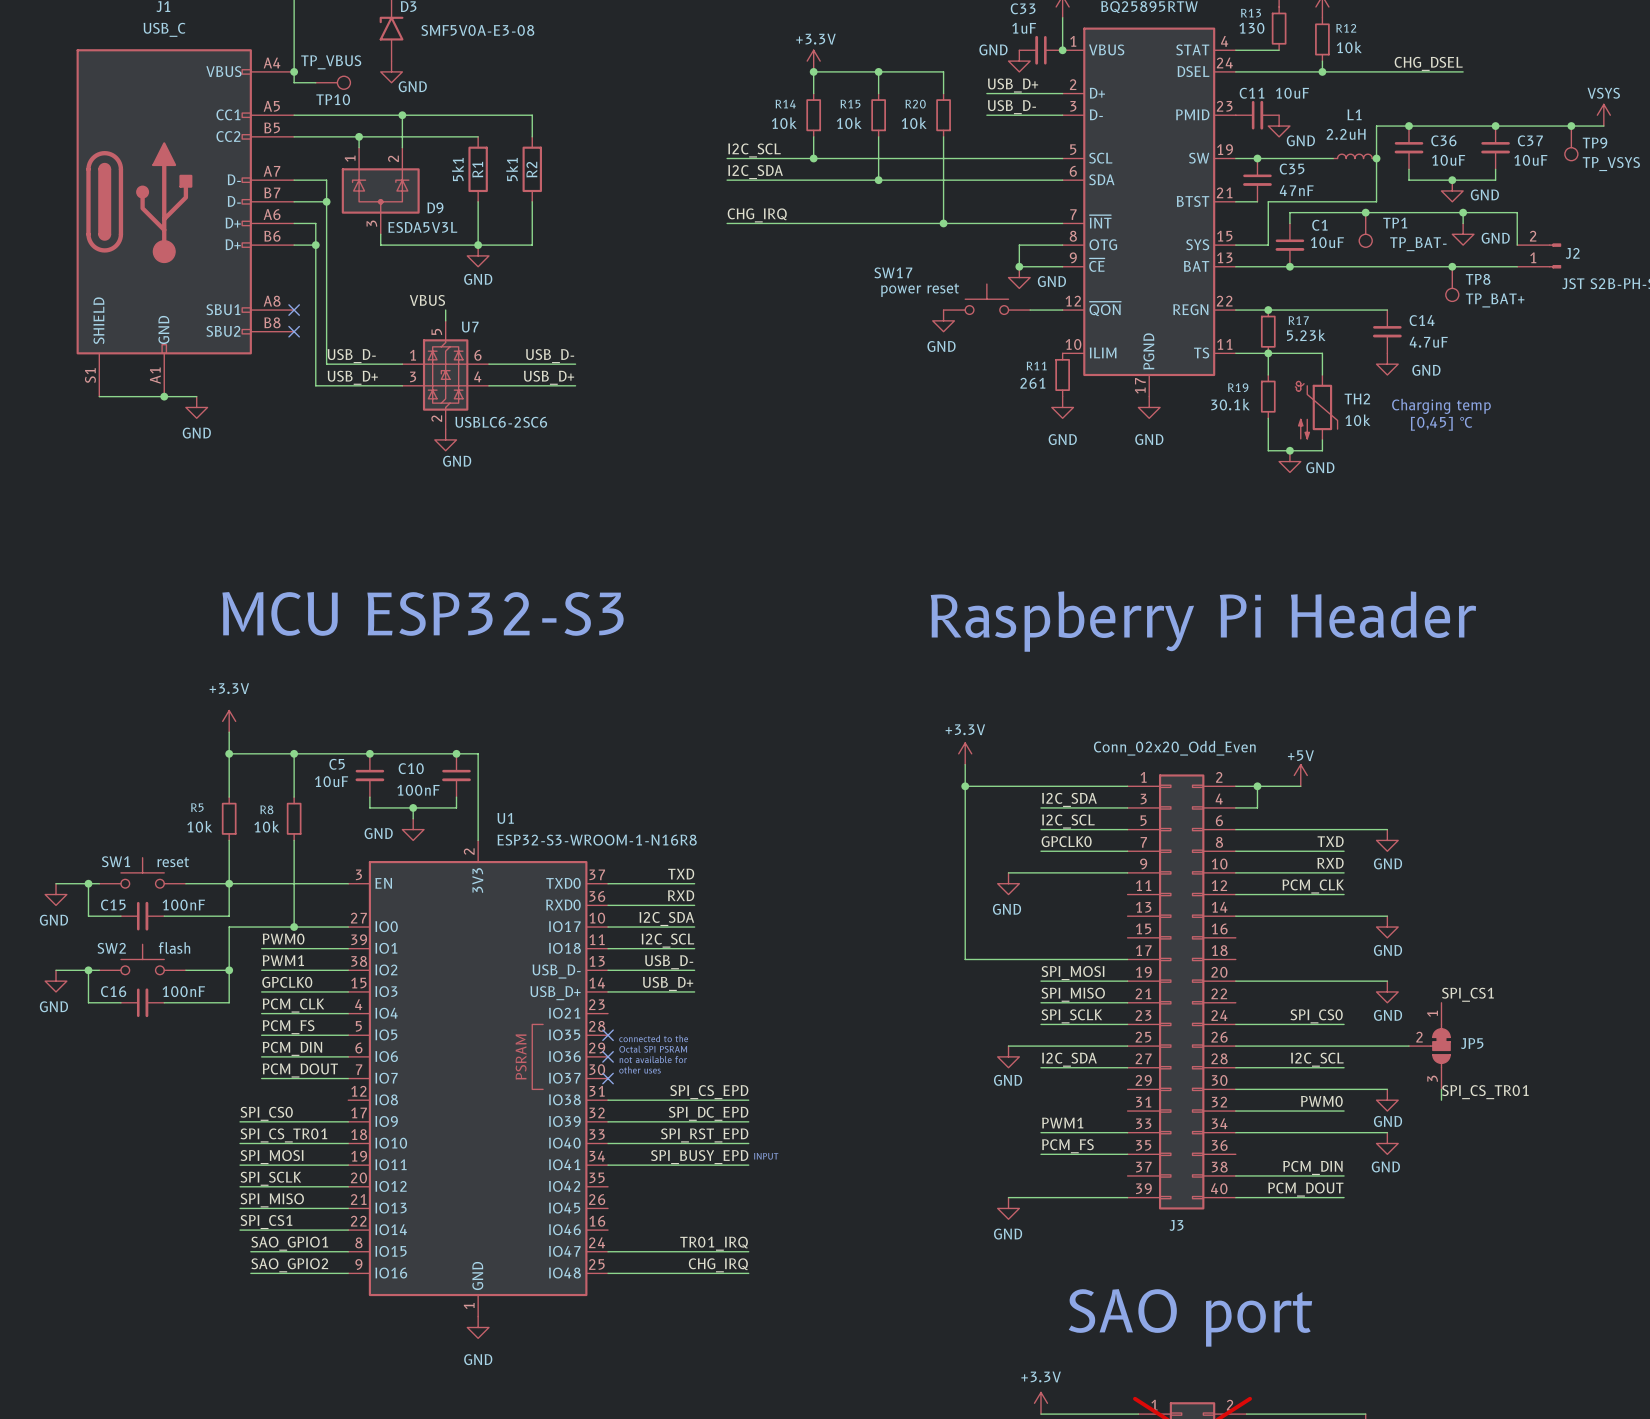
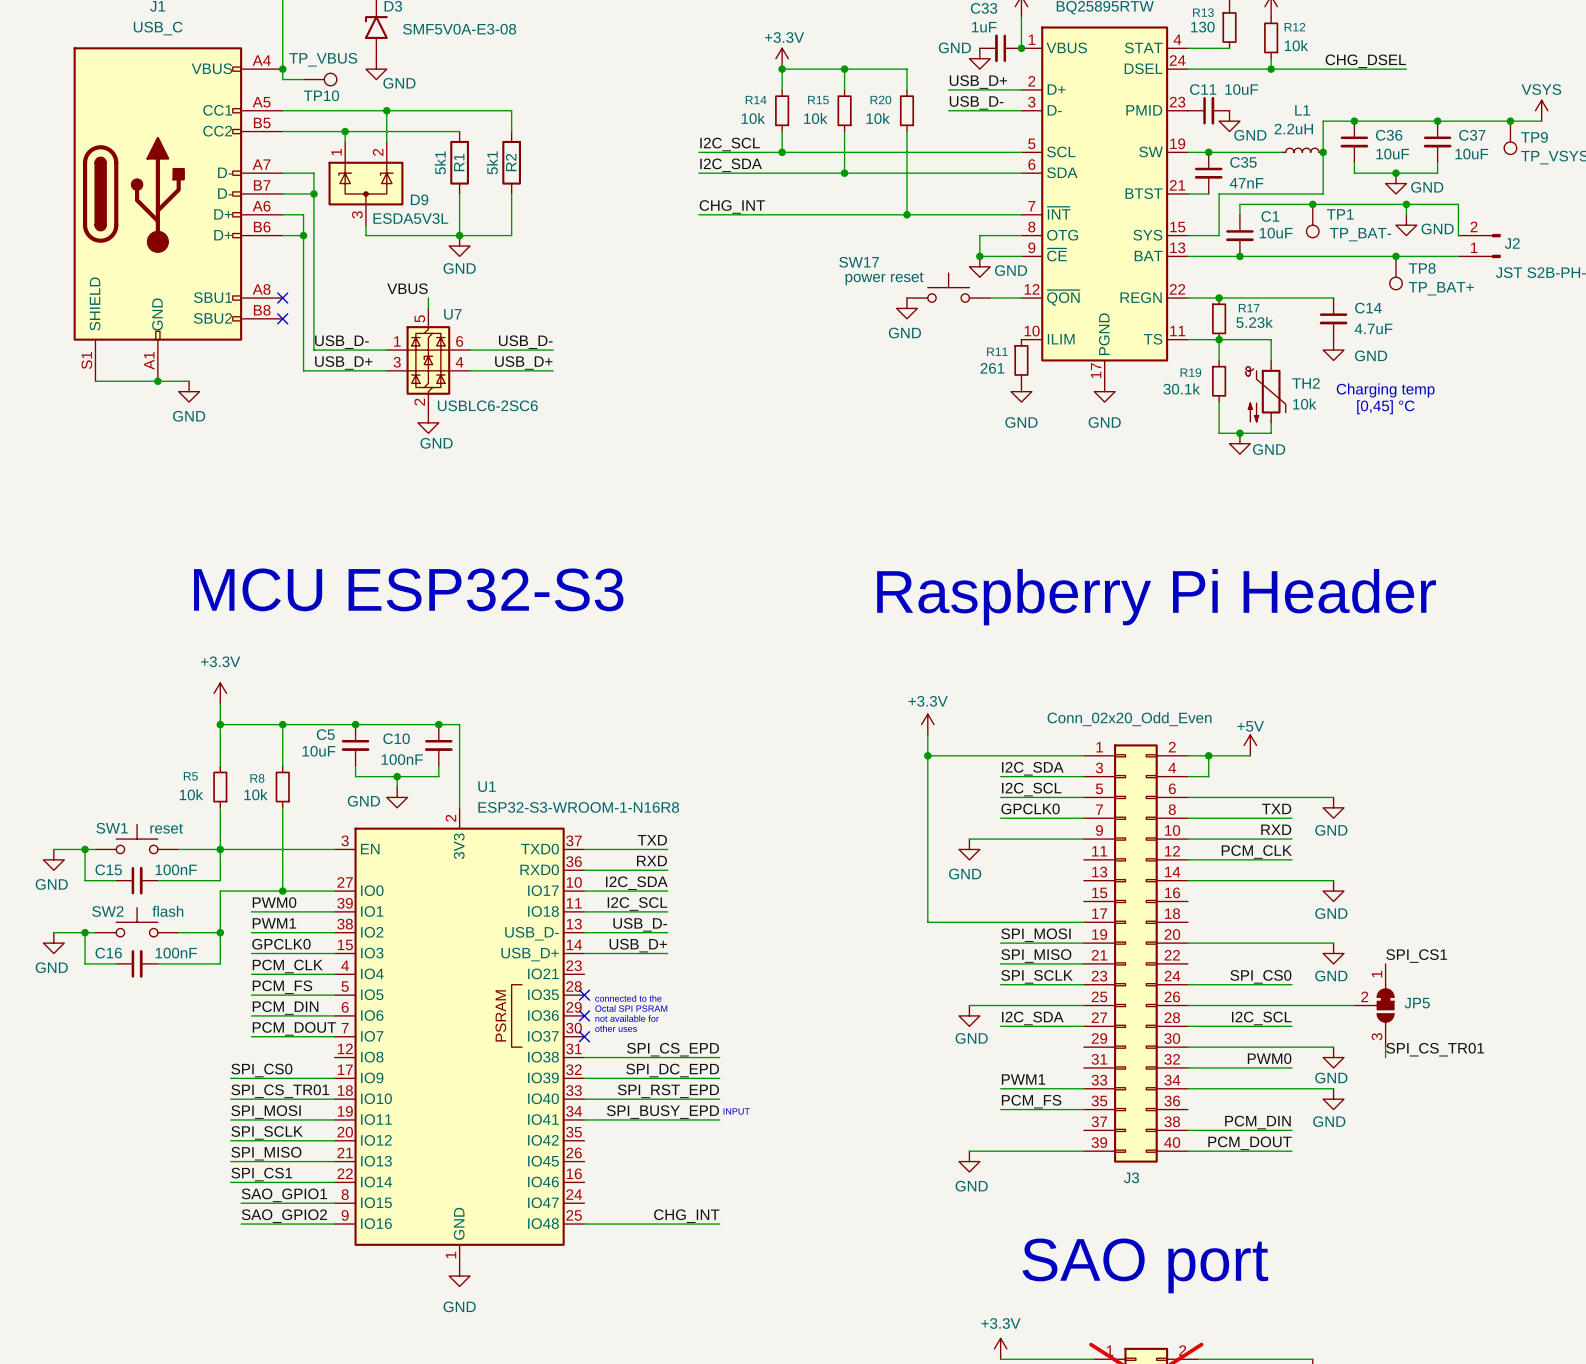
label: CHG_IRQ (757, 215) -> CHG_INT (732, 206)
label: TR01_IRQ (714, 1243) -> none
wire: (608, 1251) (748, 1251) -> none
label: CHG_IRQ (718, 1265) -> CHG_INT (686, 1216)

